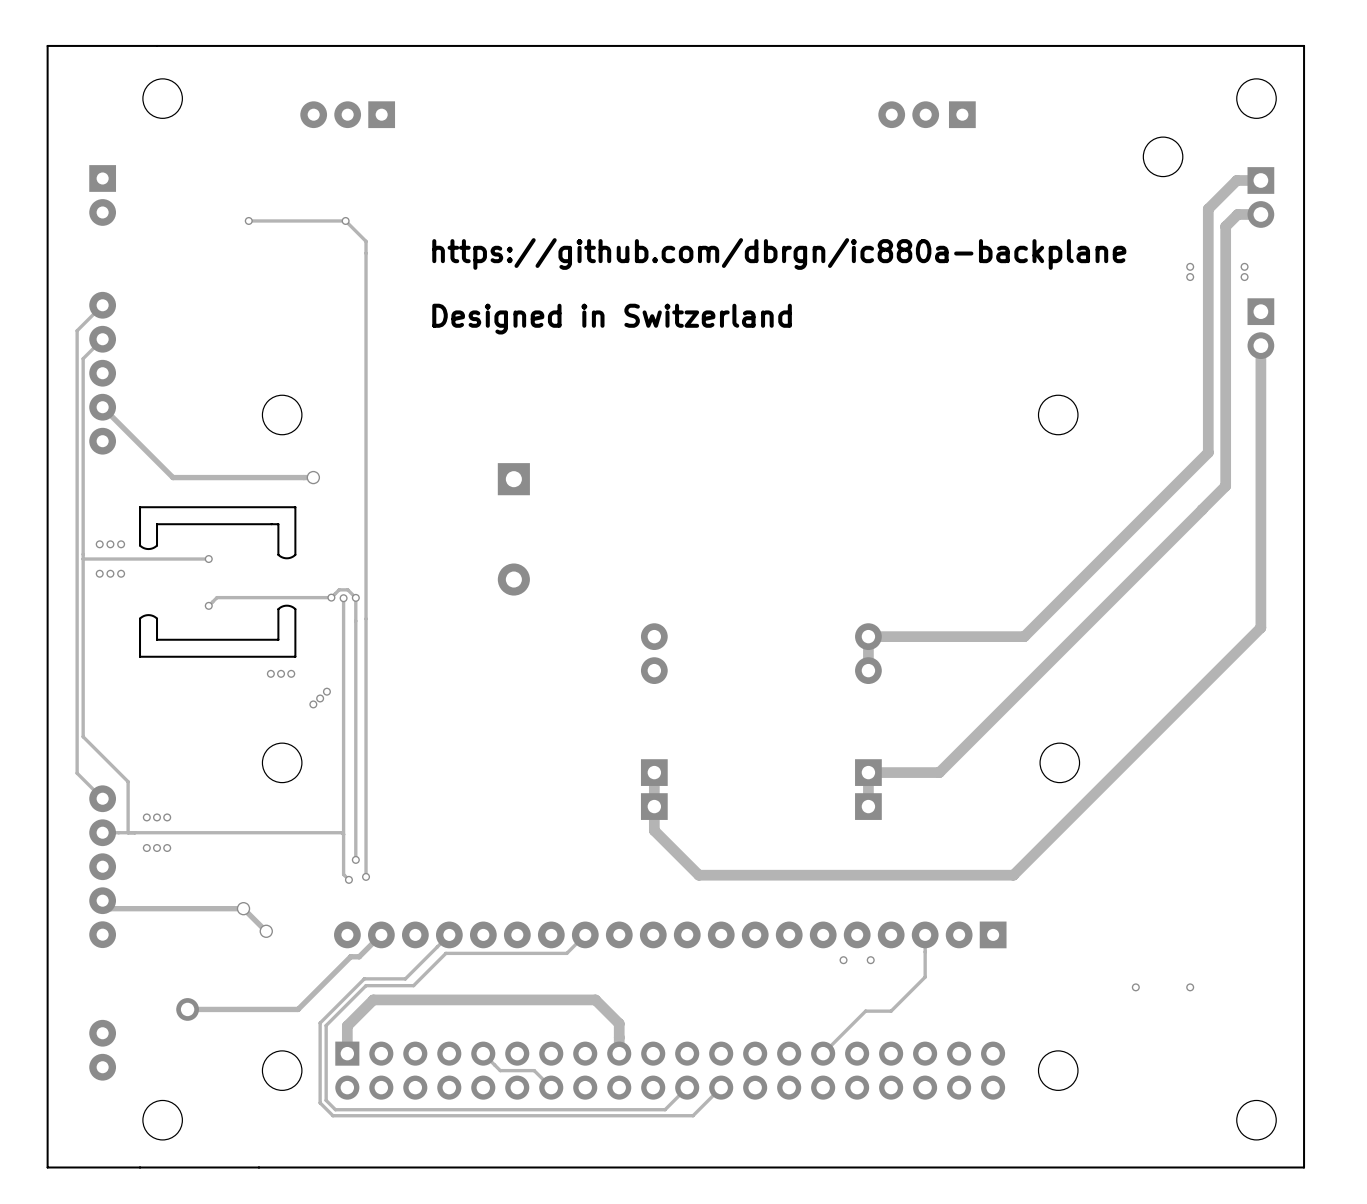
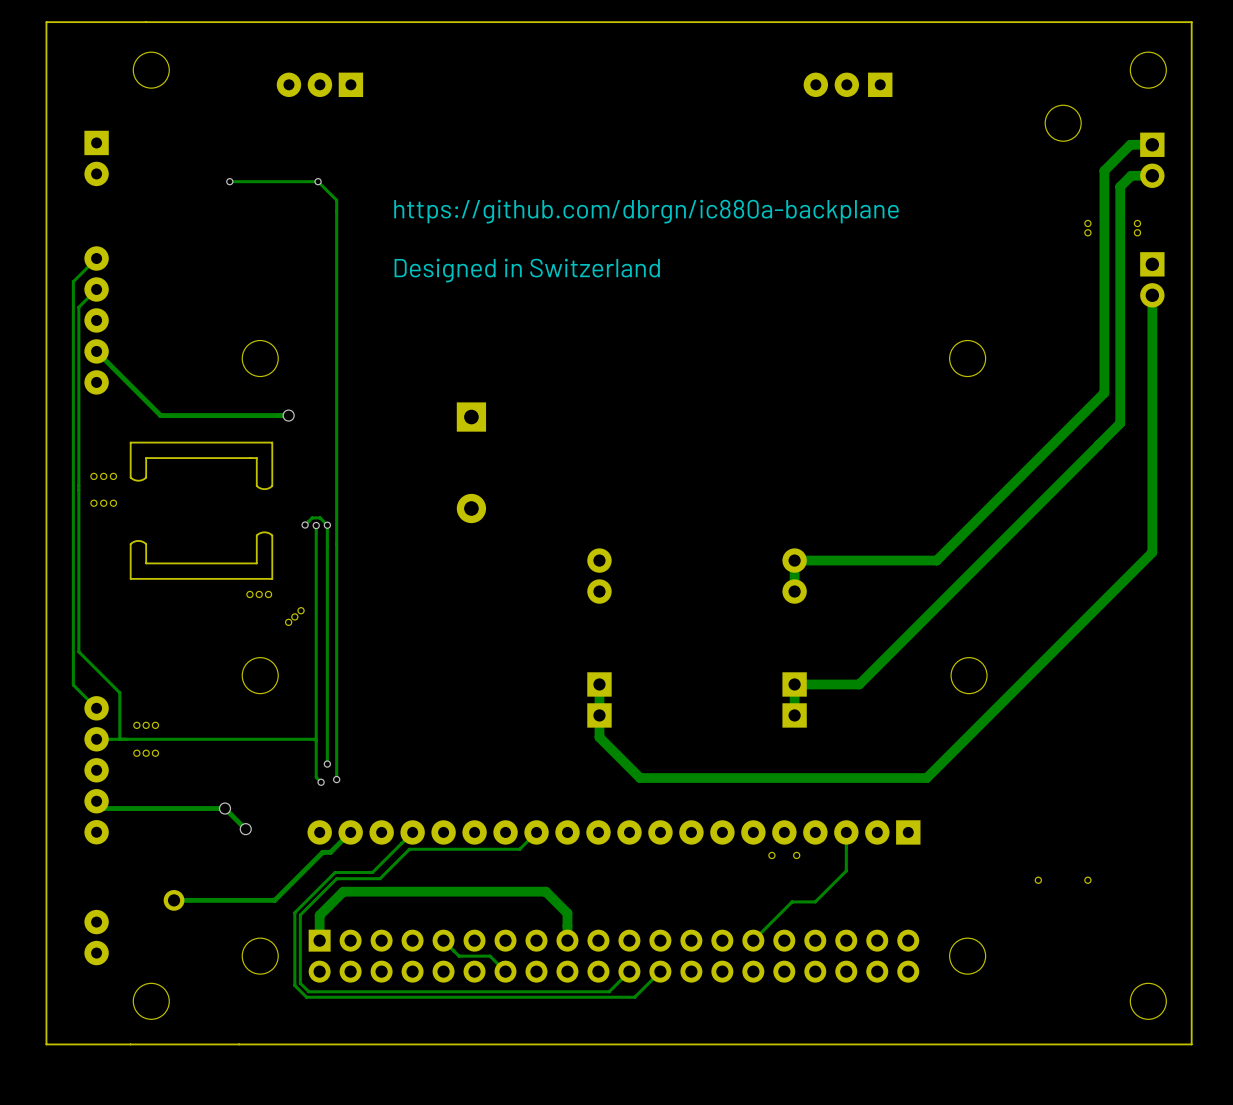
track: (208, 559) (83, 559) -> none
via: (208, 559) -> none
track: (331, 597) (217, 597) (208, 605) -> none
via: (208, 605) -> none

